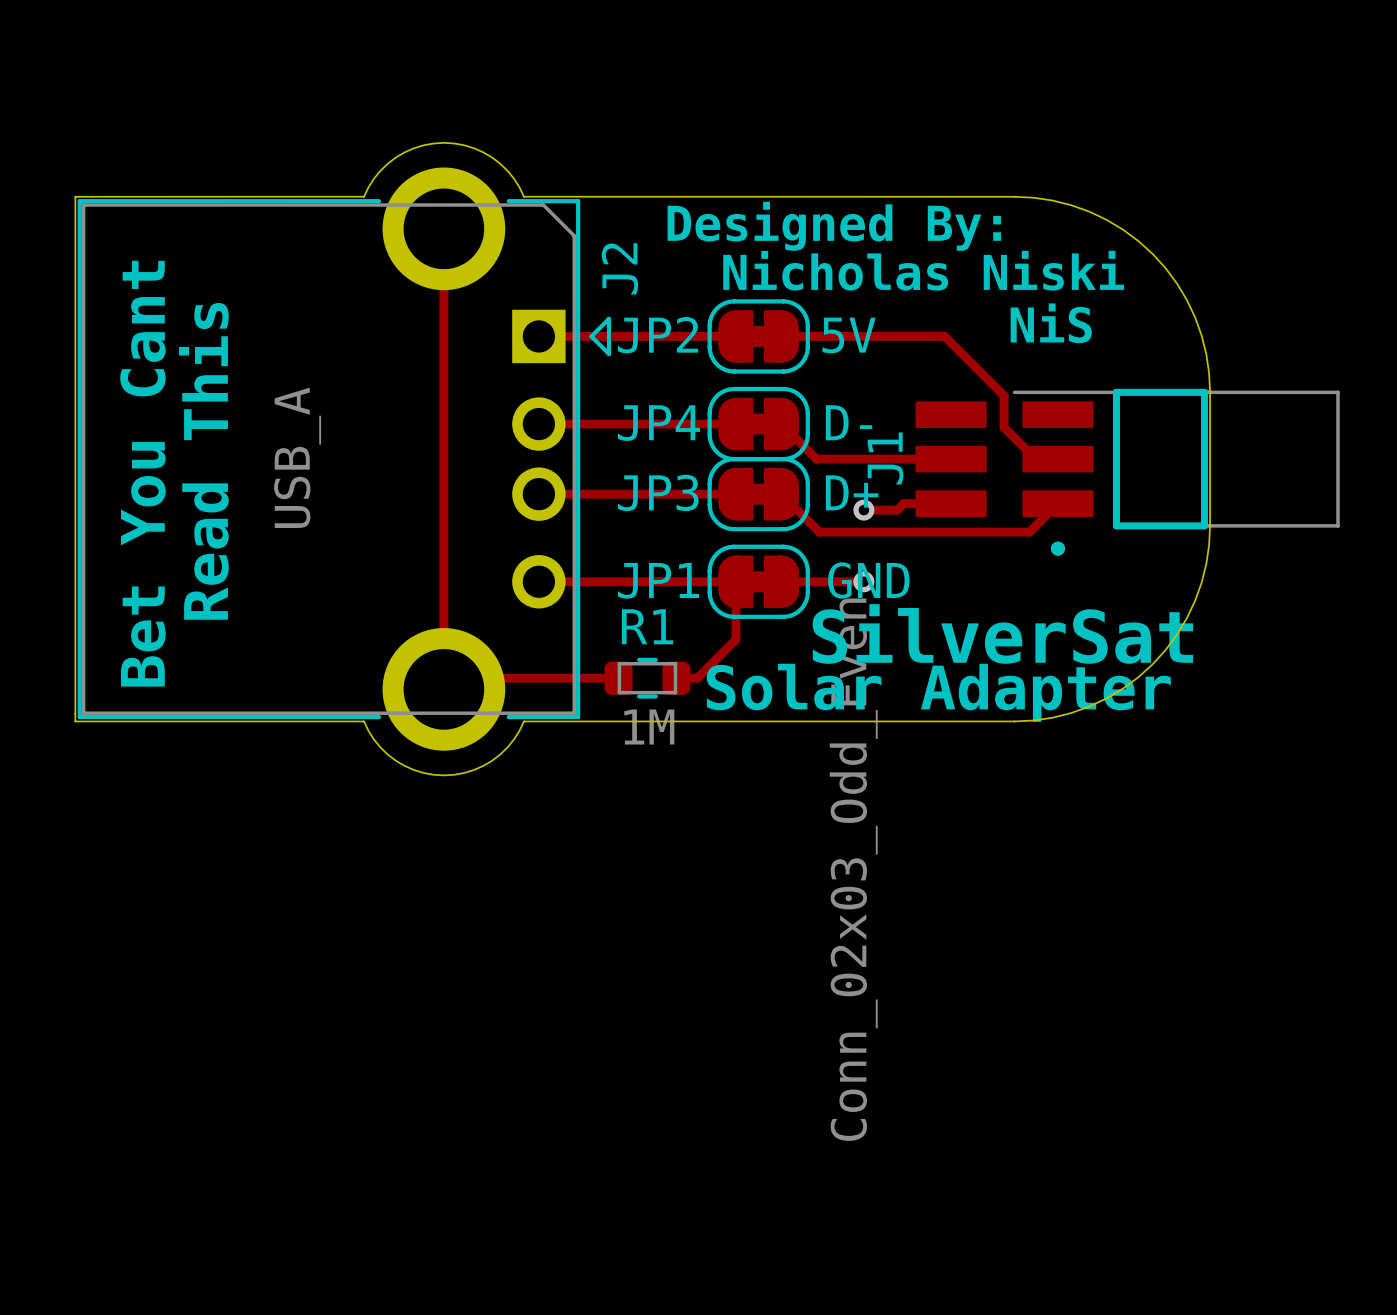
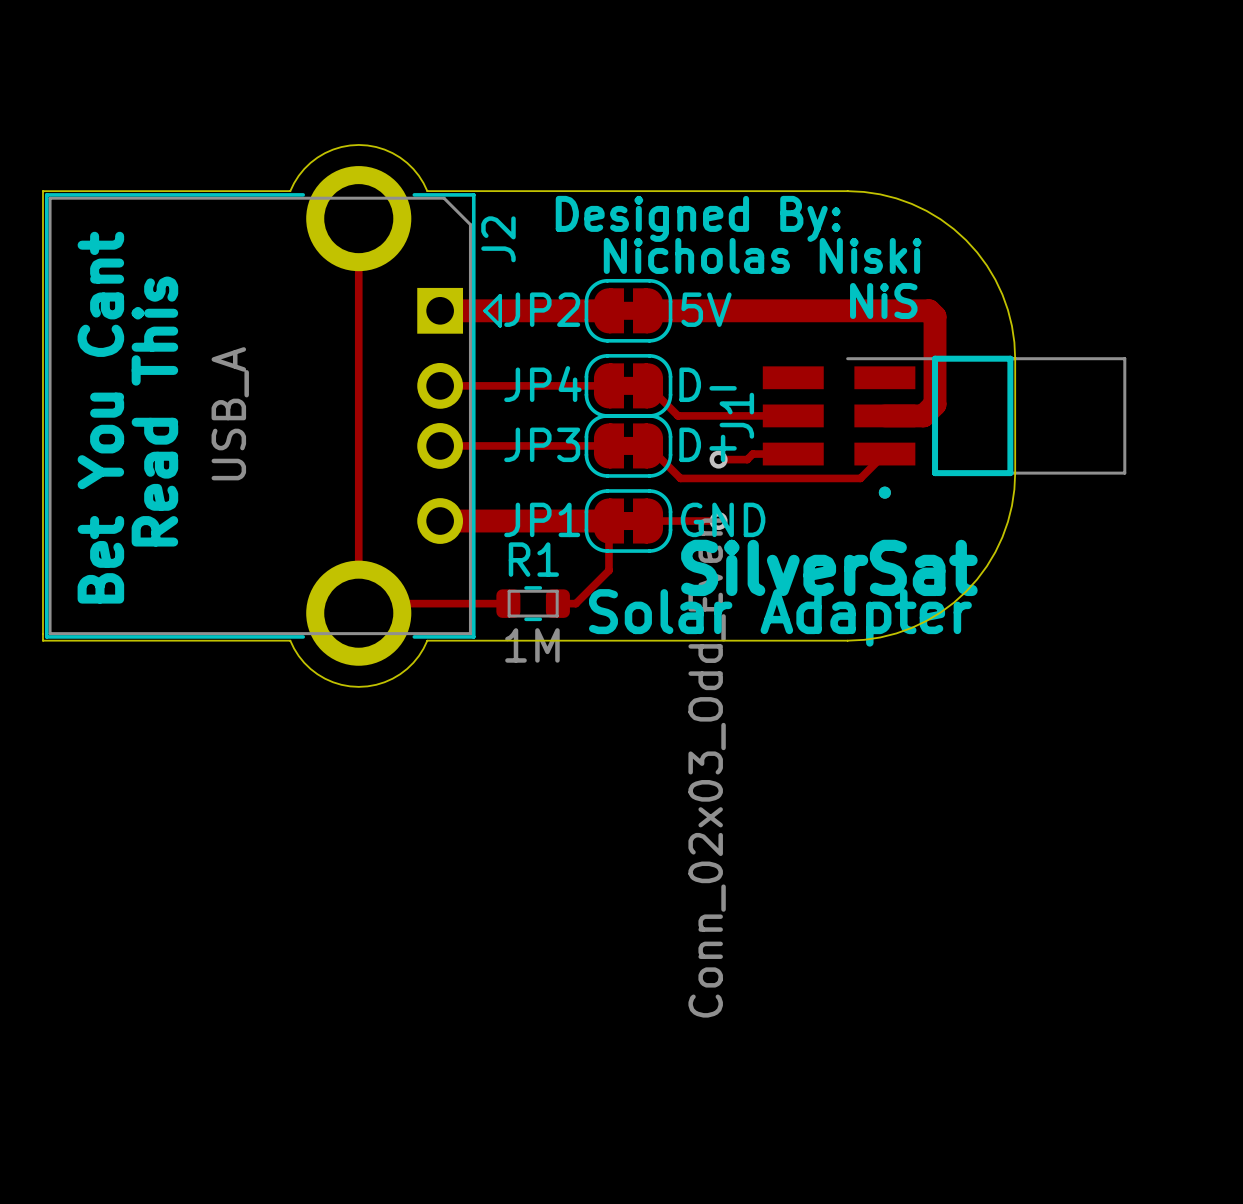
J2 name position: J2 (619, 268) -> J2 (498, 239)
track width: thin (538, 336) (735, 336) -> thick (440, 310) (608, 310)
track width: thin (781, 336) (944, 336) -> thick (648, 310) (787, 310)
track: (944, 336) (1004, 395) (1004, 427) (1035, 459) -> (787, 310) (929, 310) (935, 316) (935, 404) (923, 415) (884, 415)
track width: thin (538, 581) (735, 581) -> thick (440, 521) (608, 521)

